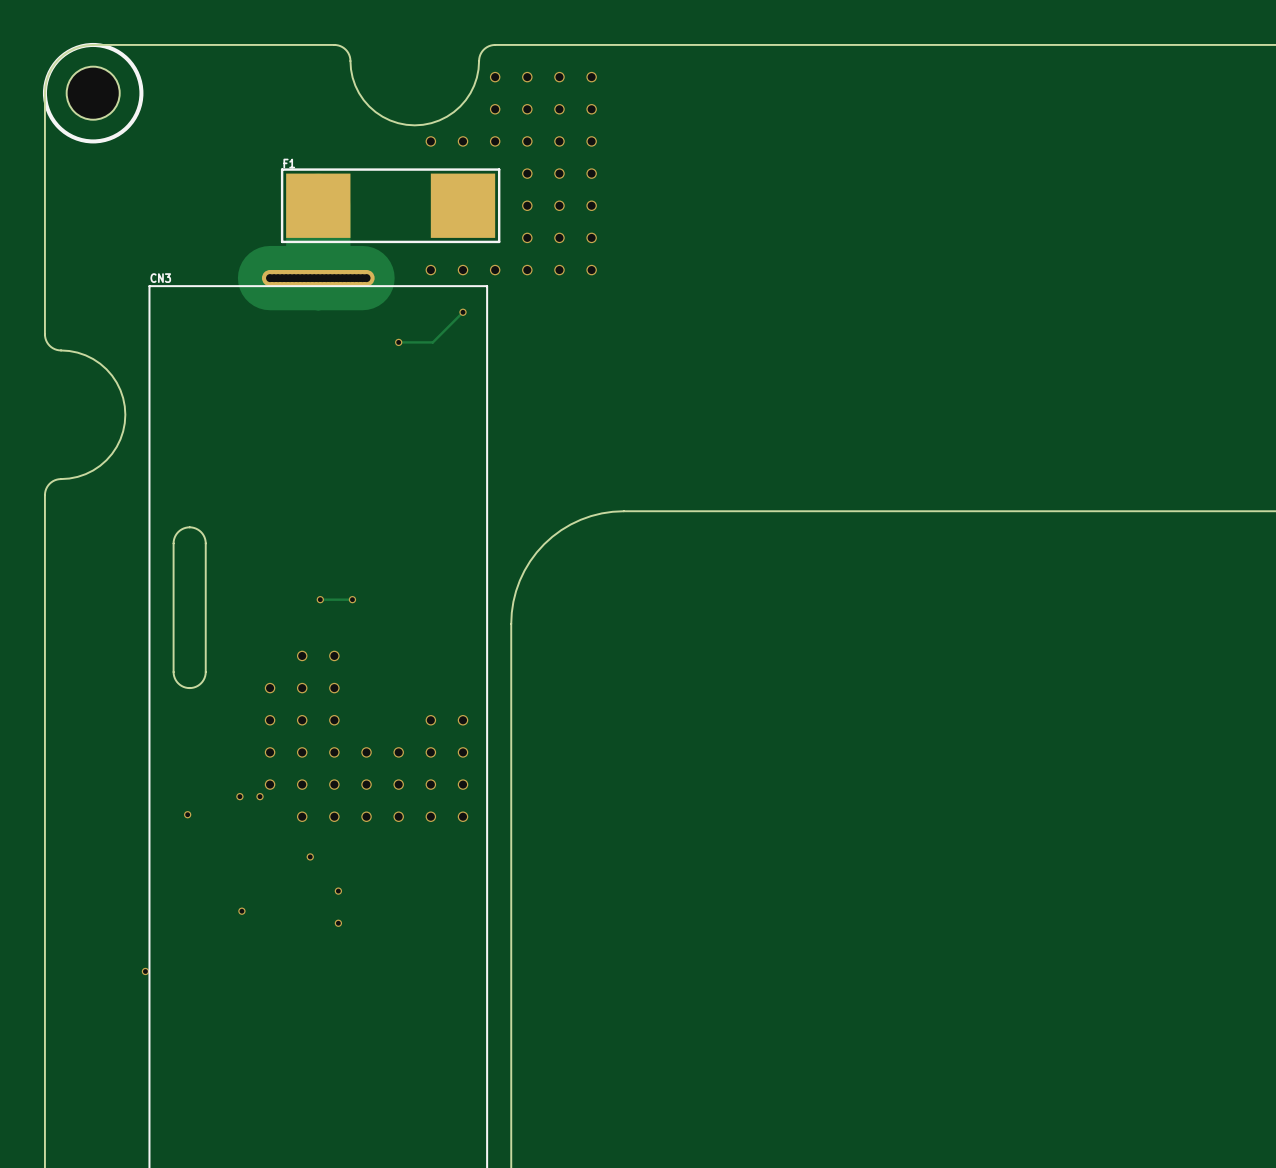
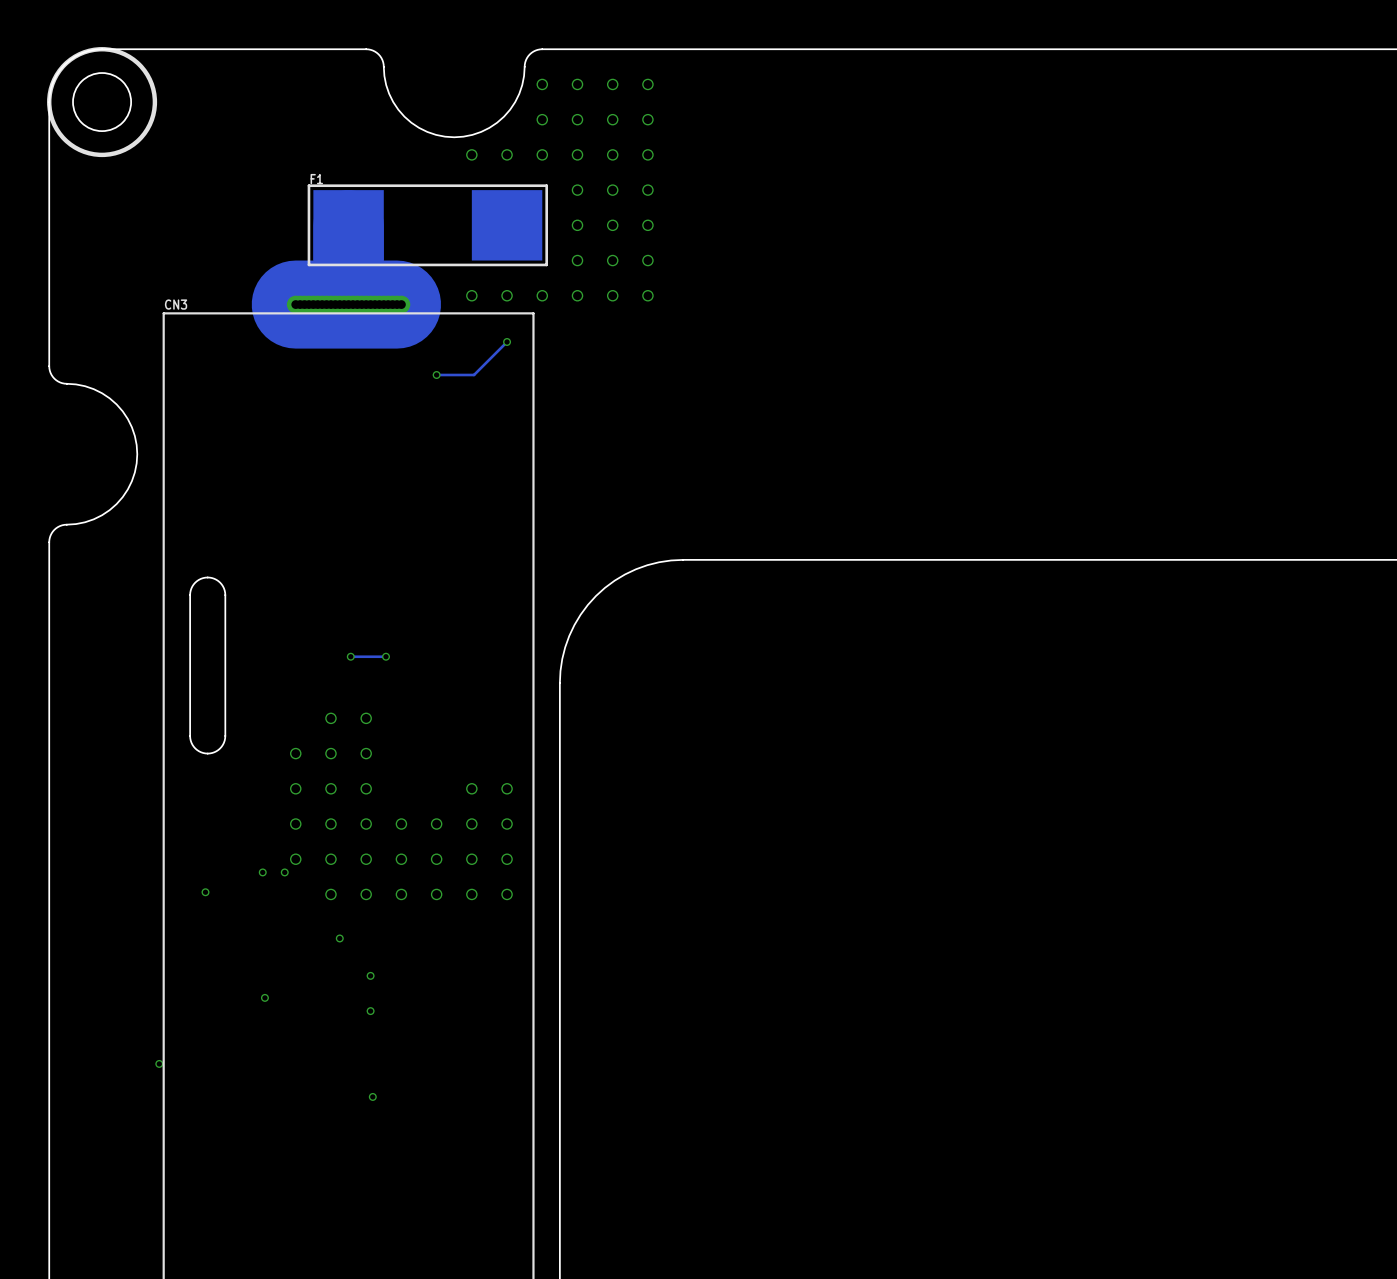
track width: thin (362, 278) (270, 278) -> thick (397, 304) (295, 304)
via: none -> (372, 1096)

